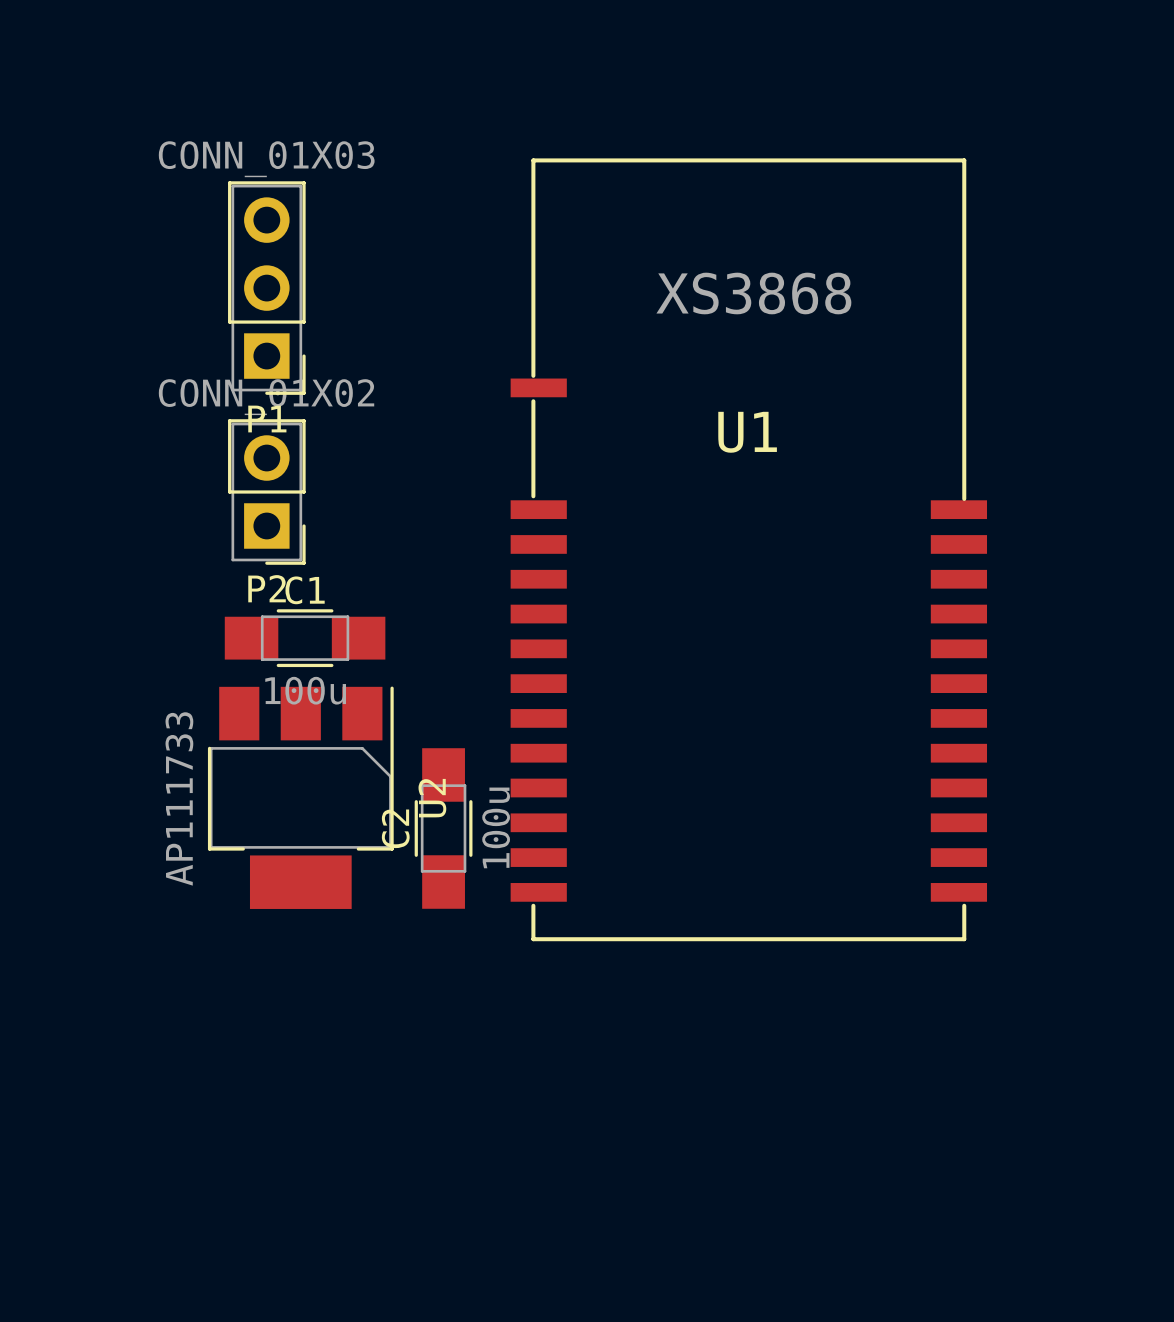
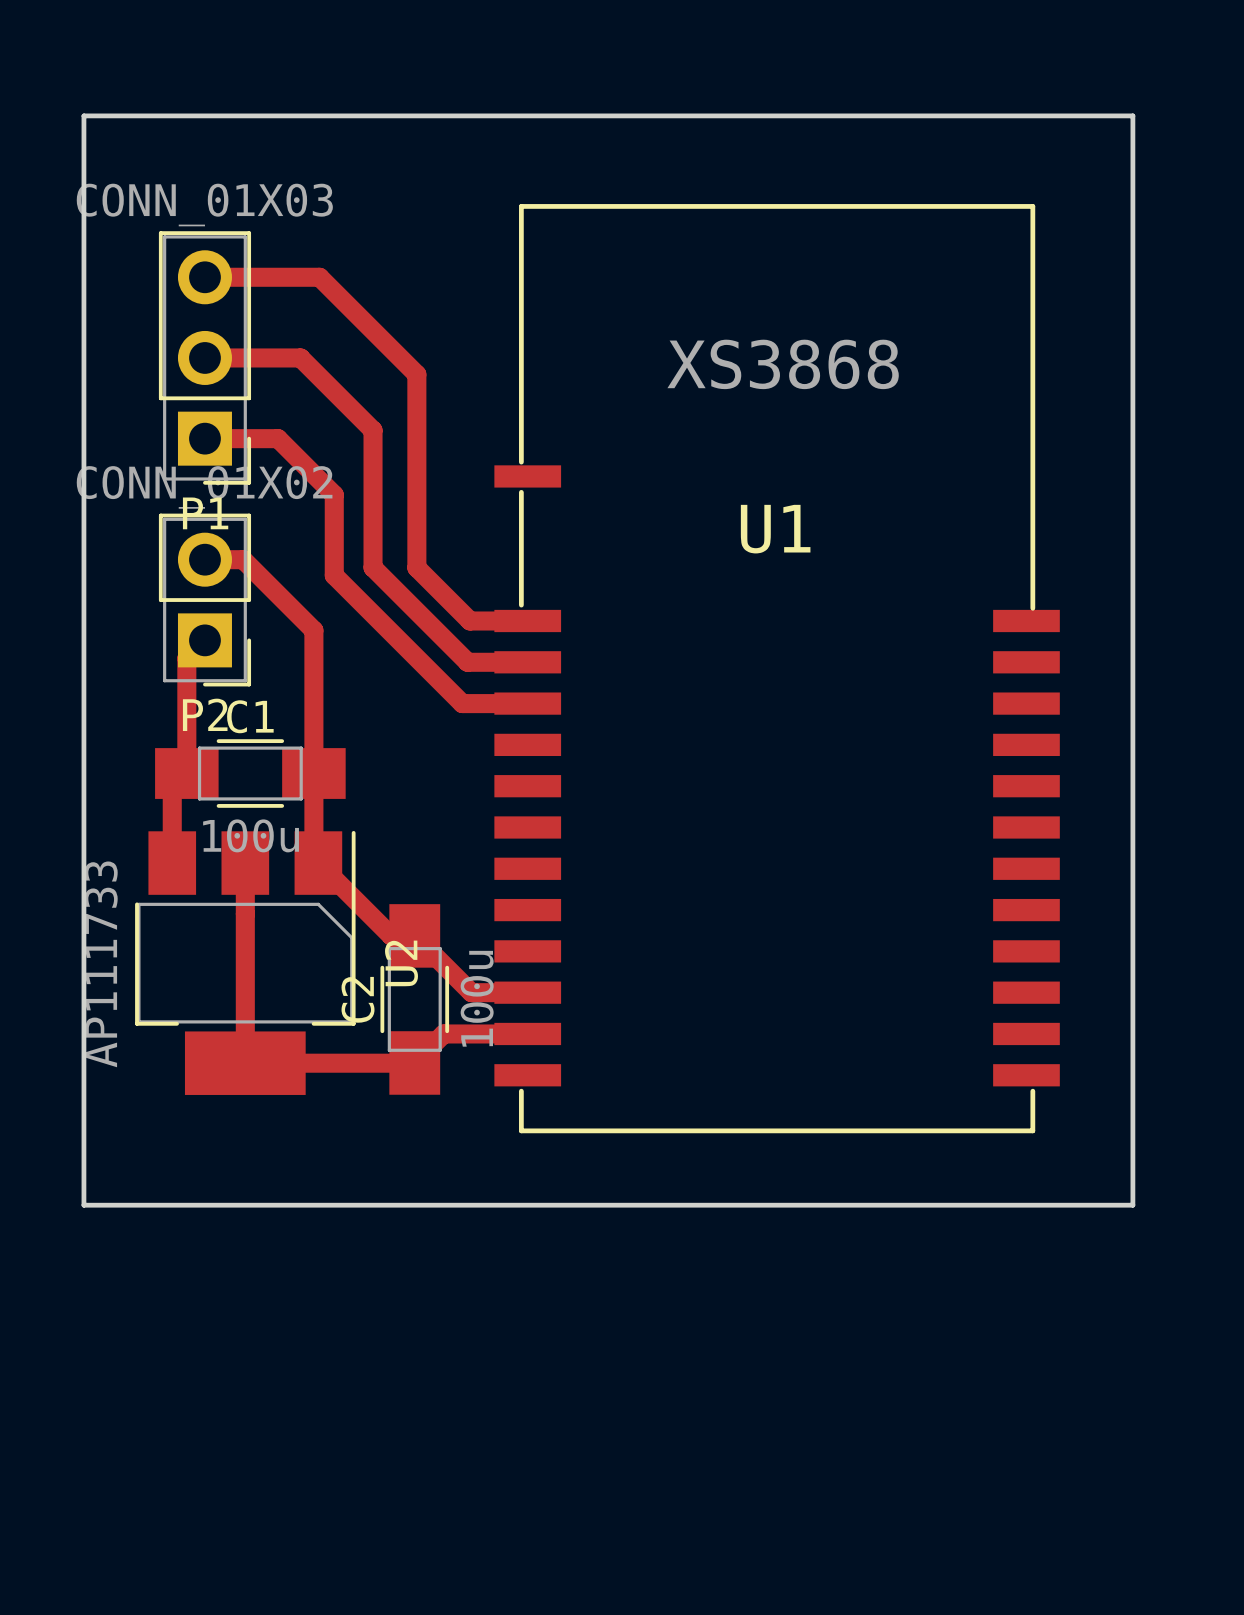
board edge: none -> (83, 115) (83, 1205) (1132, 1205) (1132, 115) (83, 115)
track: none -> (204, 277) (319, 277) (416, 374) (416, 567) (470, 621) (527, 621)
track: none -> (204, 357) (300, 357) (373, 430) (373, 567) (467, 662) (527, 662)
track: none -> (204, 438) (278, 438) (334, 494) (334, 575) (462, 703) (527, 703)
track: none -> (204, 559) (243, 559) (313, 630) (313, 858) (391, 935) (414, 935) (471, 992) (527, 992)
track: none -> (204, 640) (186, 658) (186, 773) (172, 788) (172, 863)
track: none -> (245, 863) (245, 1063) (414, 1063) (443, 1033) (527, 1033)

